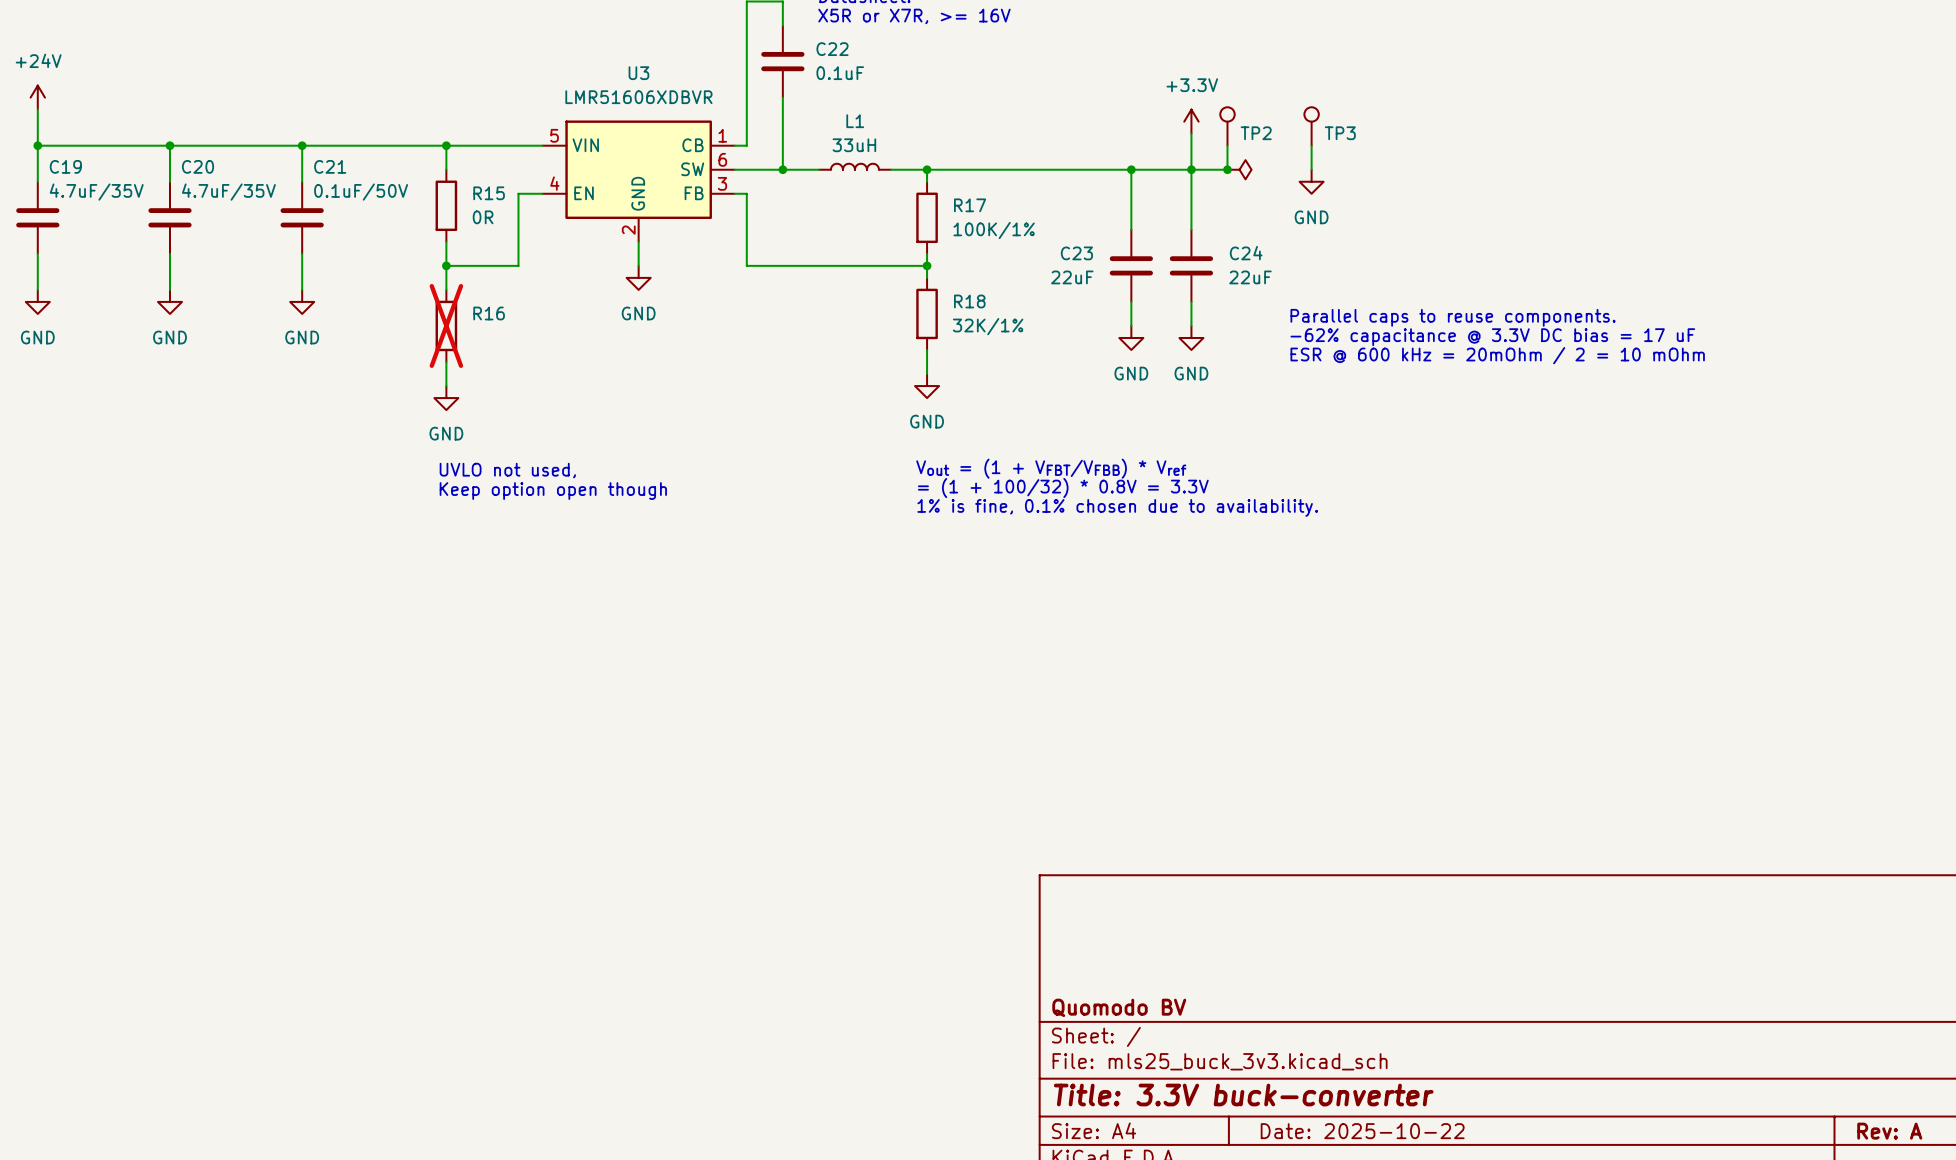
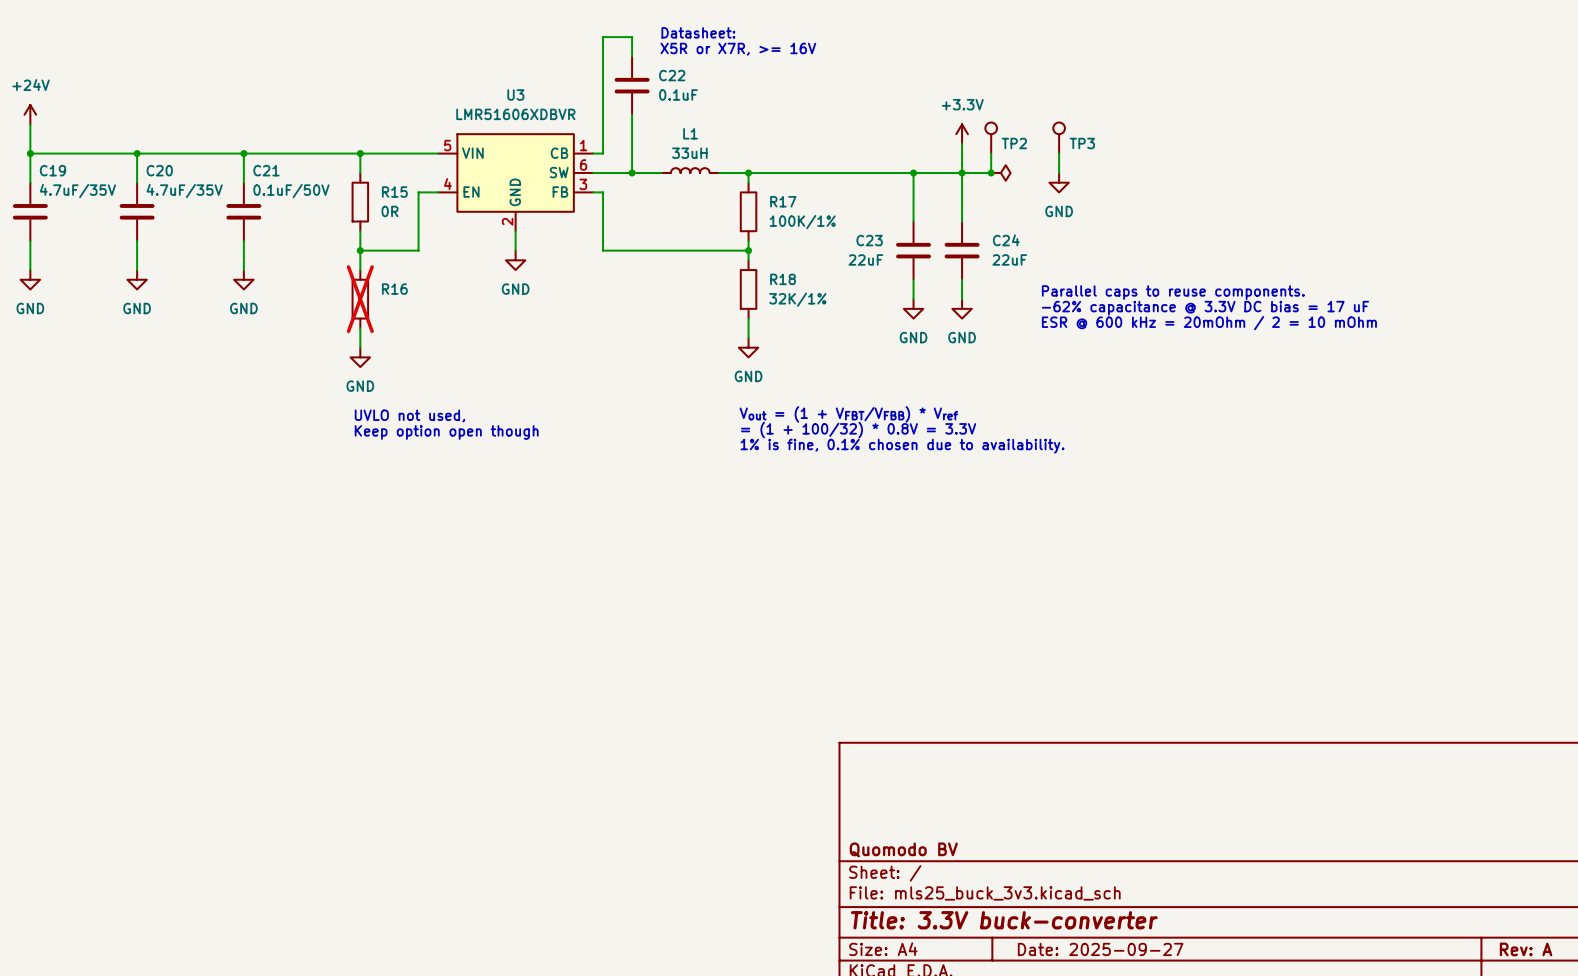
title block: Date: 2025-10-22 (1362, 1131) -> Date: 2025-09-27 (1100, 949)

